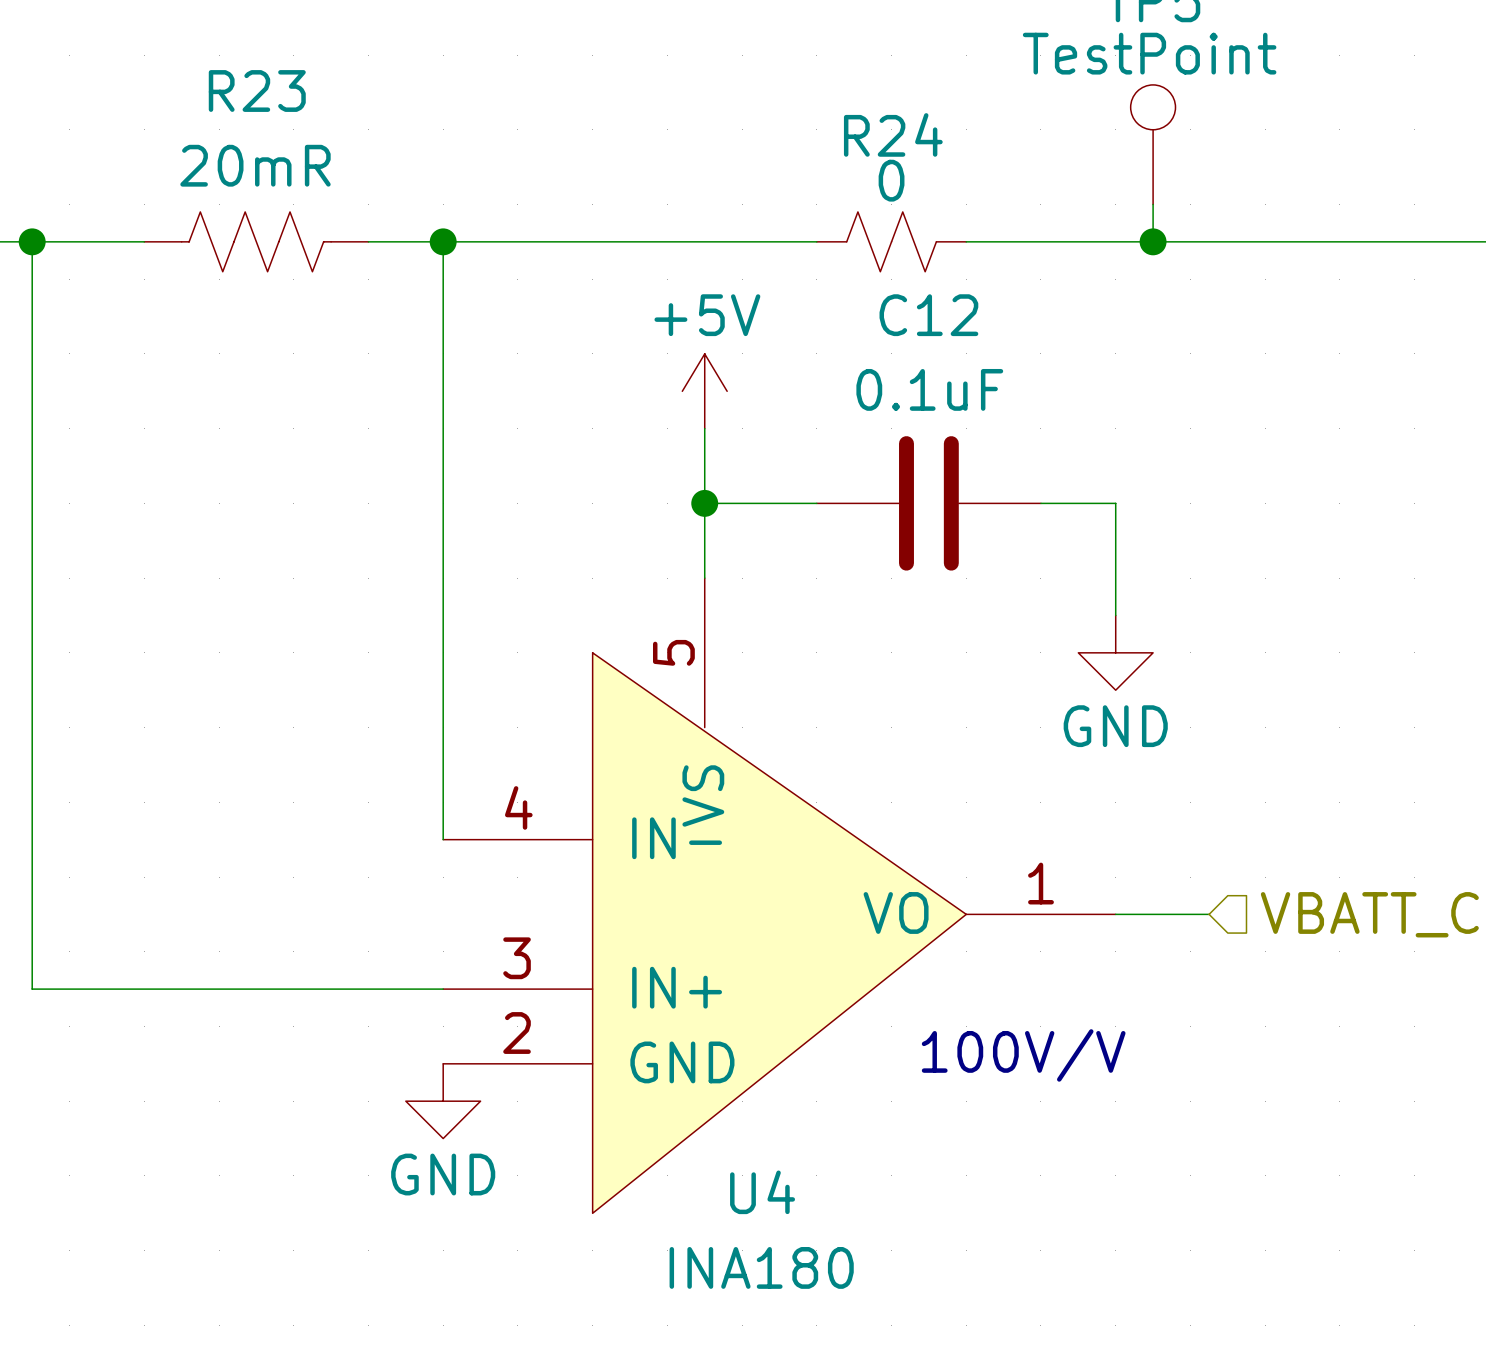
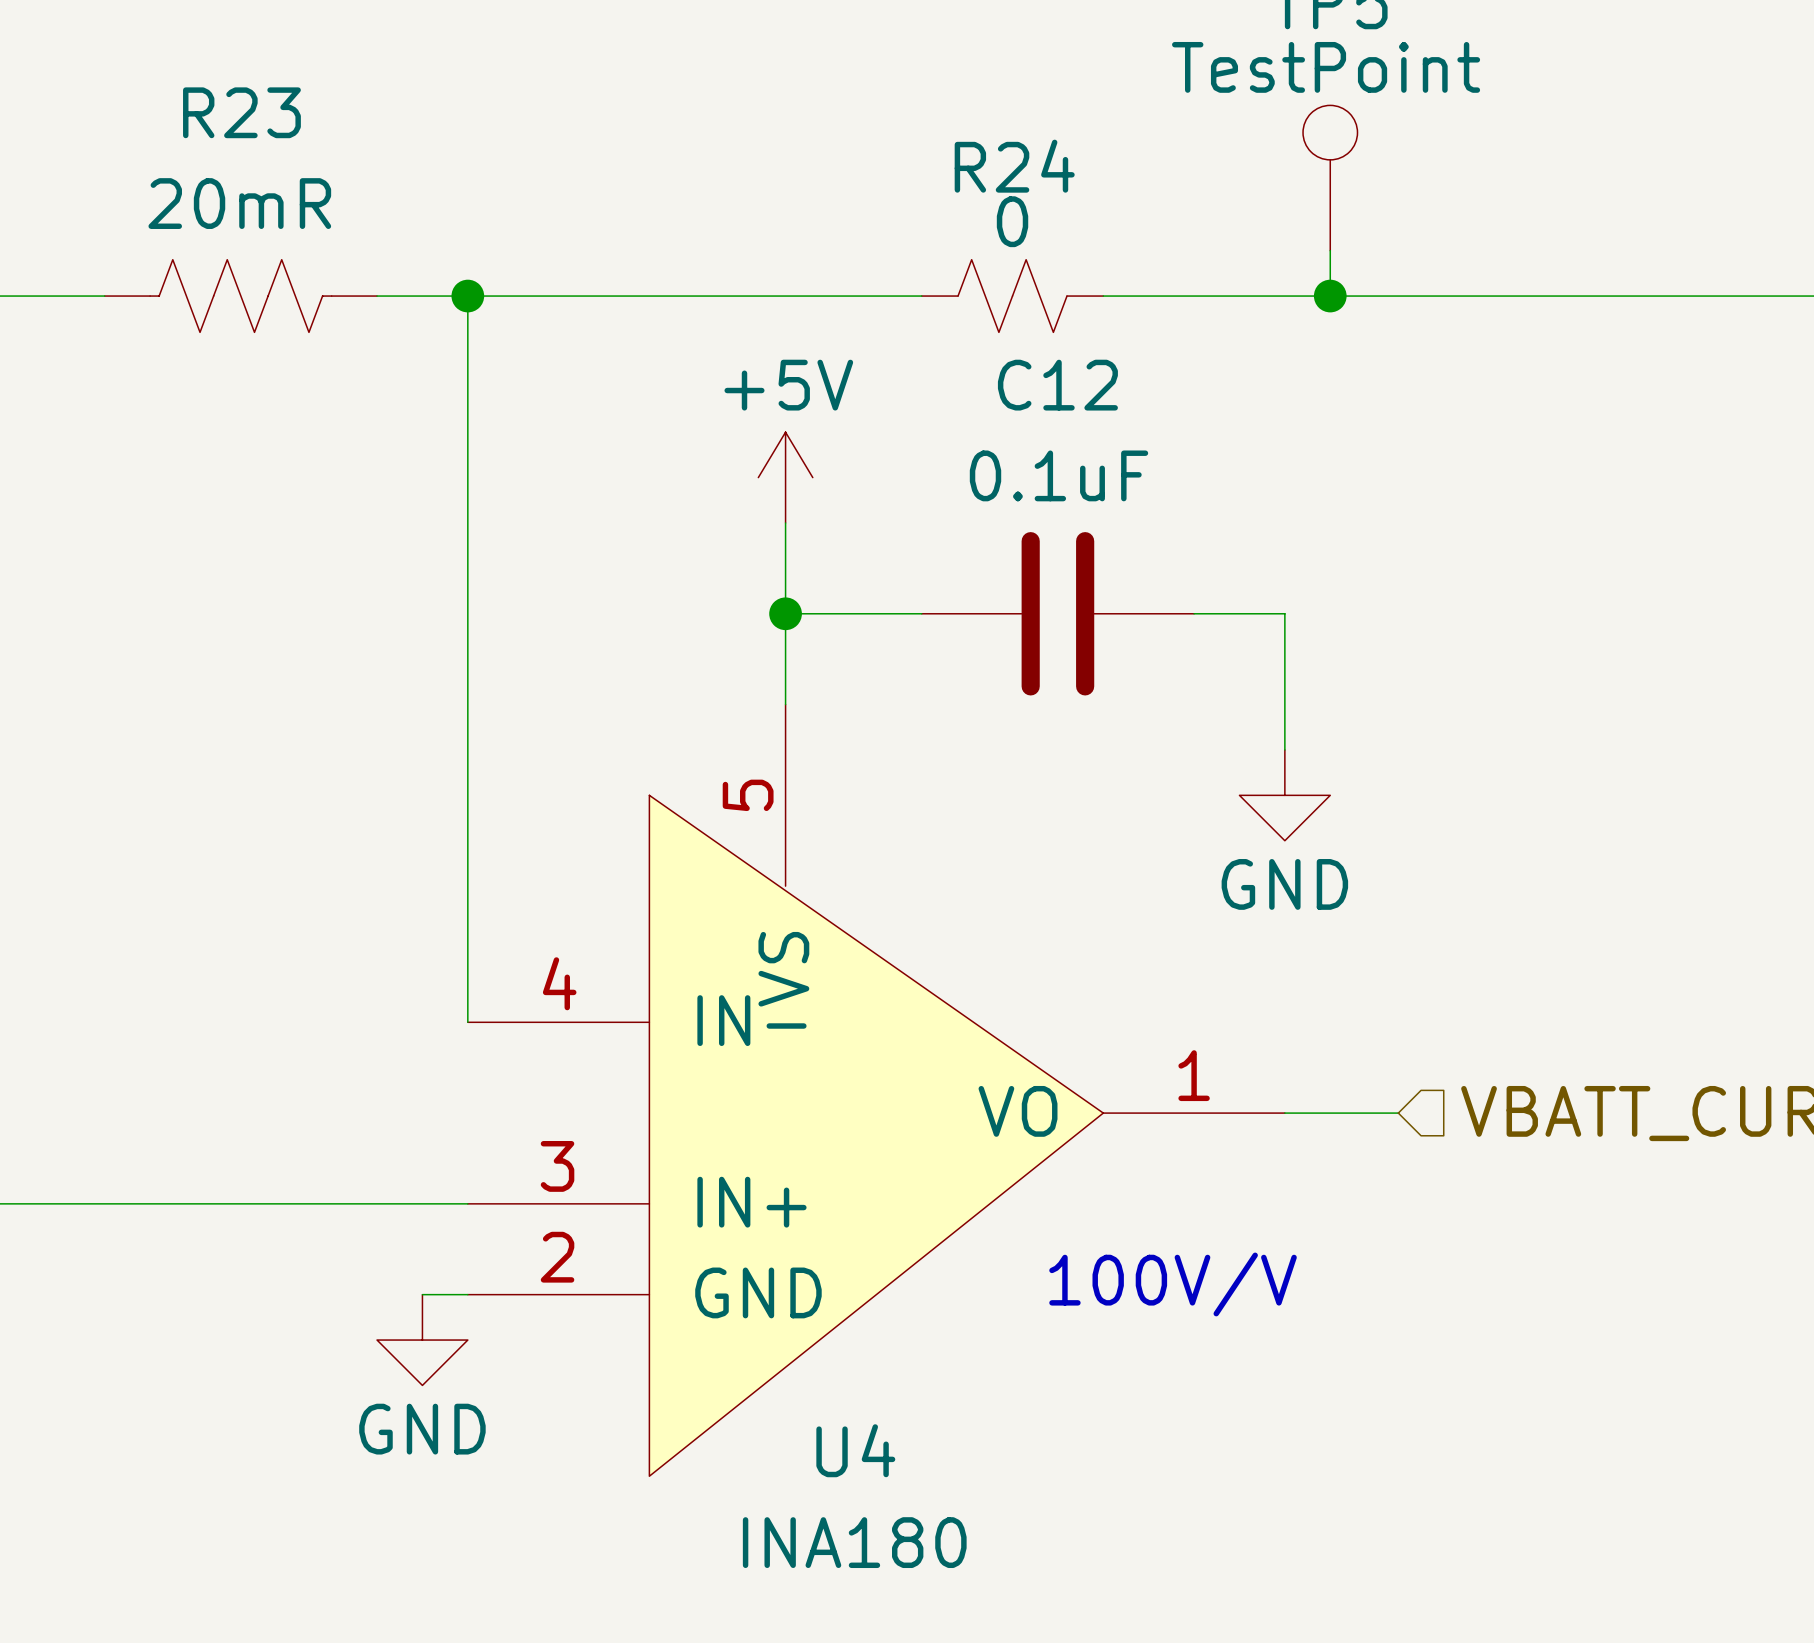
wire: none -> (422, 1294) (467, 1294)
power symbol position: GND (443, 1101) -> GND (422, 1340)

